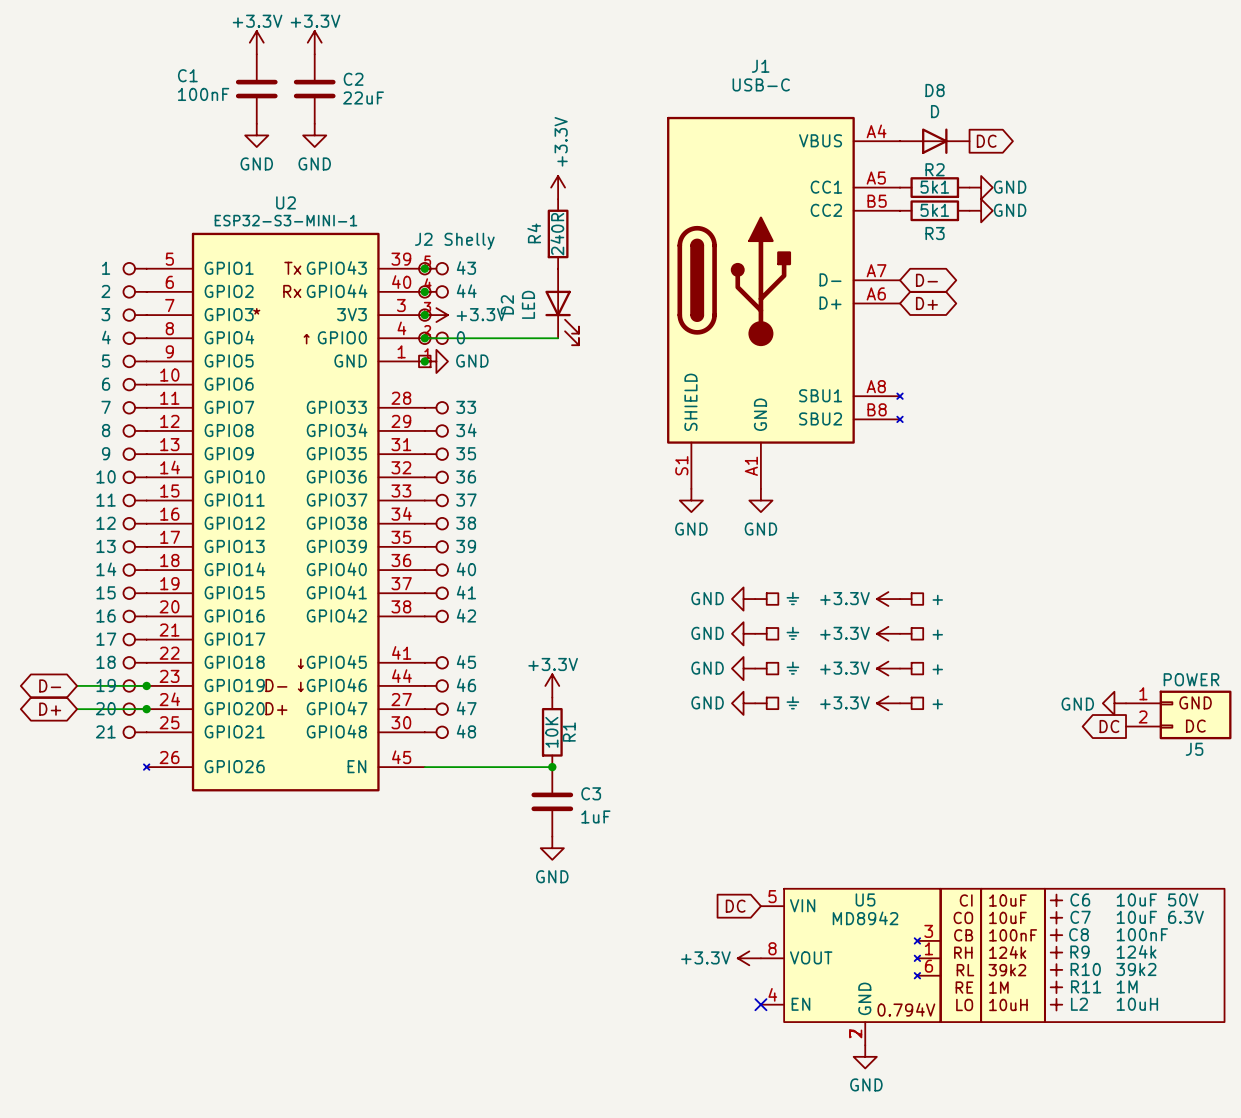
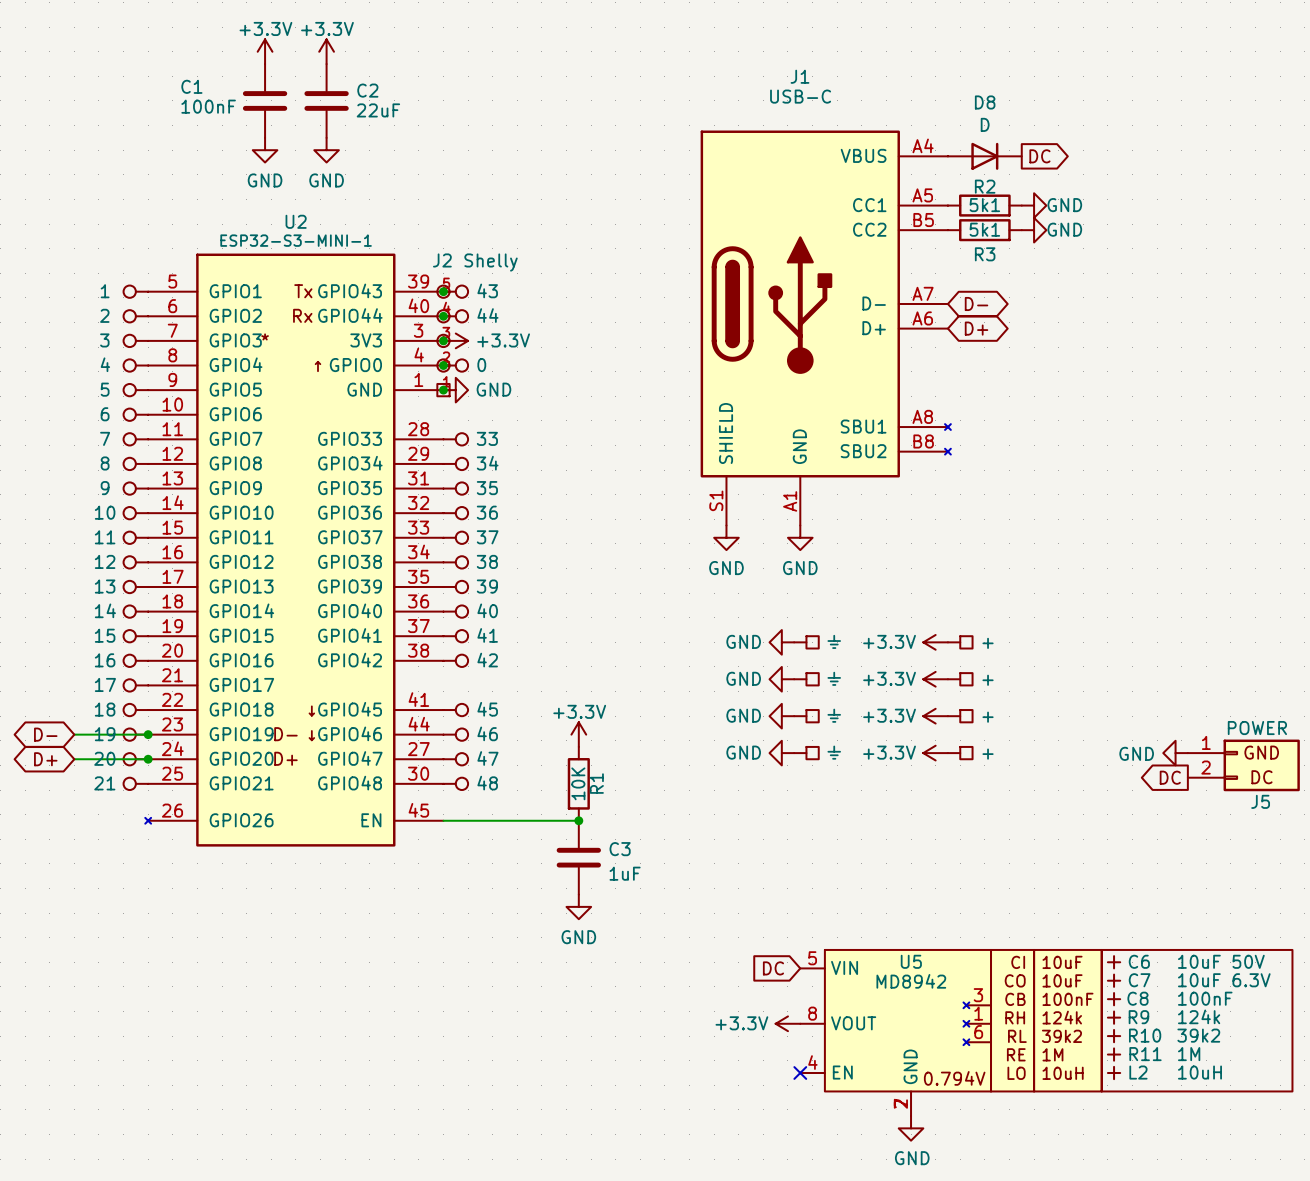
power symbol: +3.3V (558, 187) -> none
R4: 240R (558, 233) -> none
D2: LED (562, 306) -> none
wire: (424, 338) (558, 338) -> none

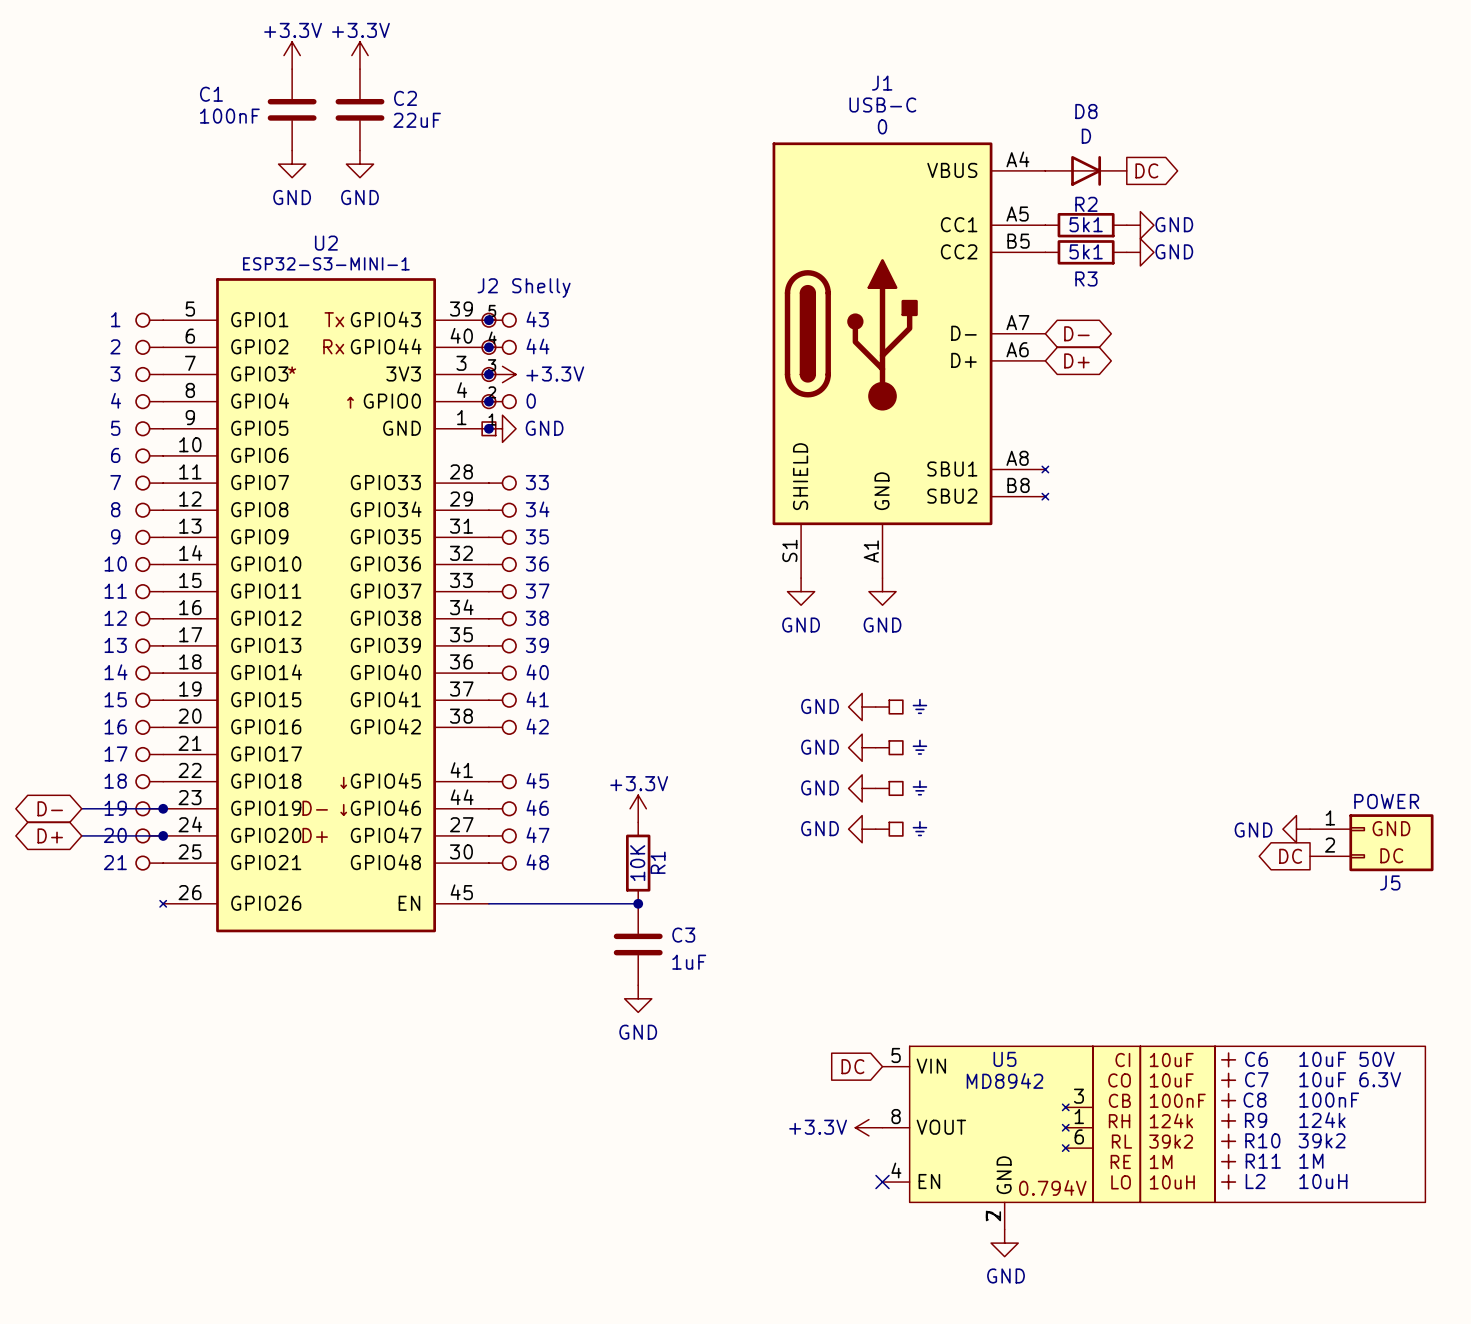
J1 text: none -> 0 (882, 126)
power symbol: +3.3V (935, 642) -> none
part: + (960, 642) -> none
power symbol: +3.3V (935, 679) -> none
part: + (960, 679) -> none
power symbol: +3.3V (935, 716) -> none
part: + (960, 716) -> none
power symbol: +3.3V (935, 753) -> none
part: + (960, 753) -> none

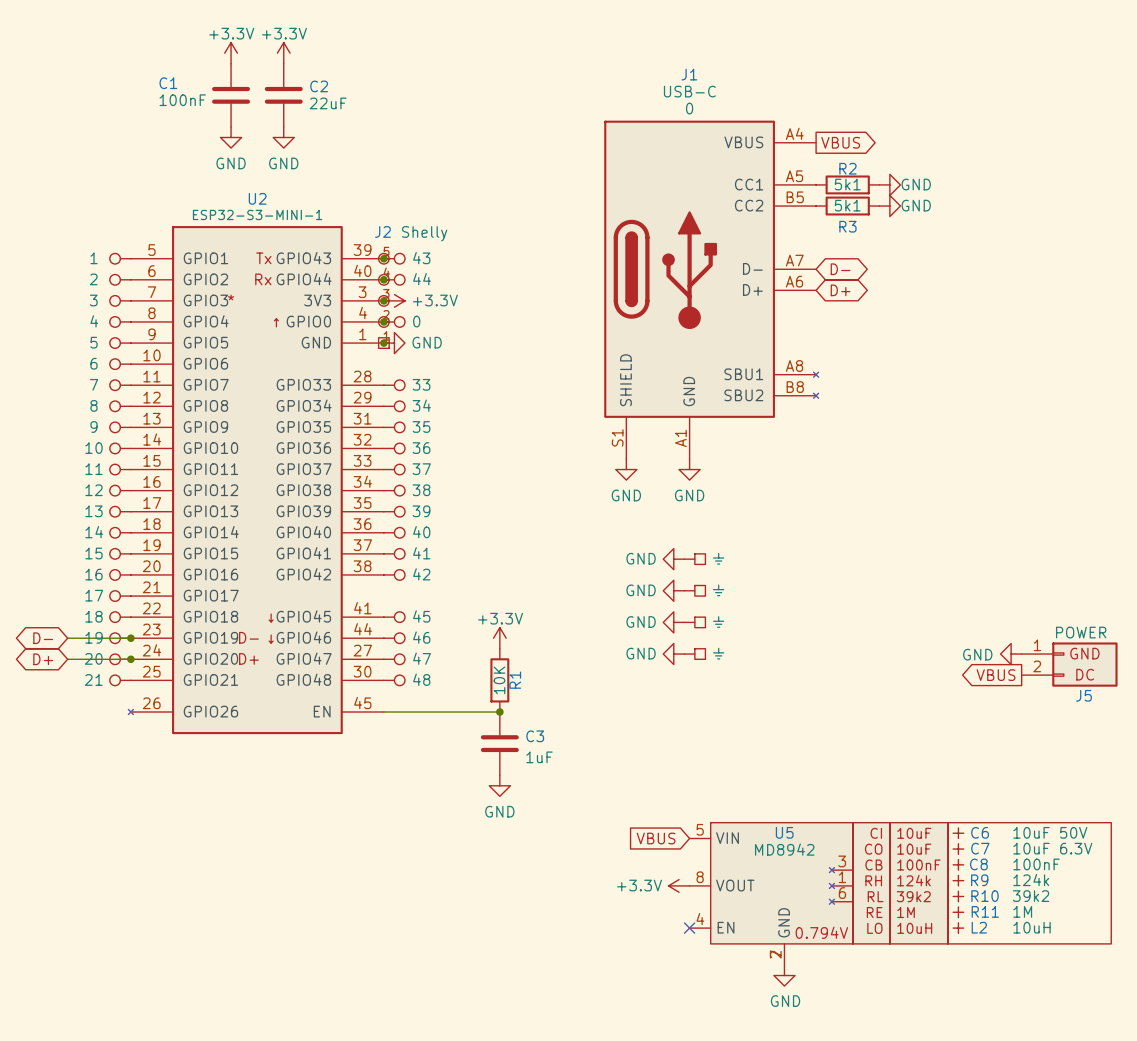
global label: none -> VBUS (840, 142)
D8: D (1086, 170) -> none
global label: DC (1146, 170) -> none
global label: DC (1290, 856) -> VBUS (996, 675)
global label: DC (852, 1066) -> VBUS (656, 838)

